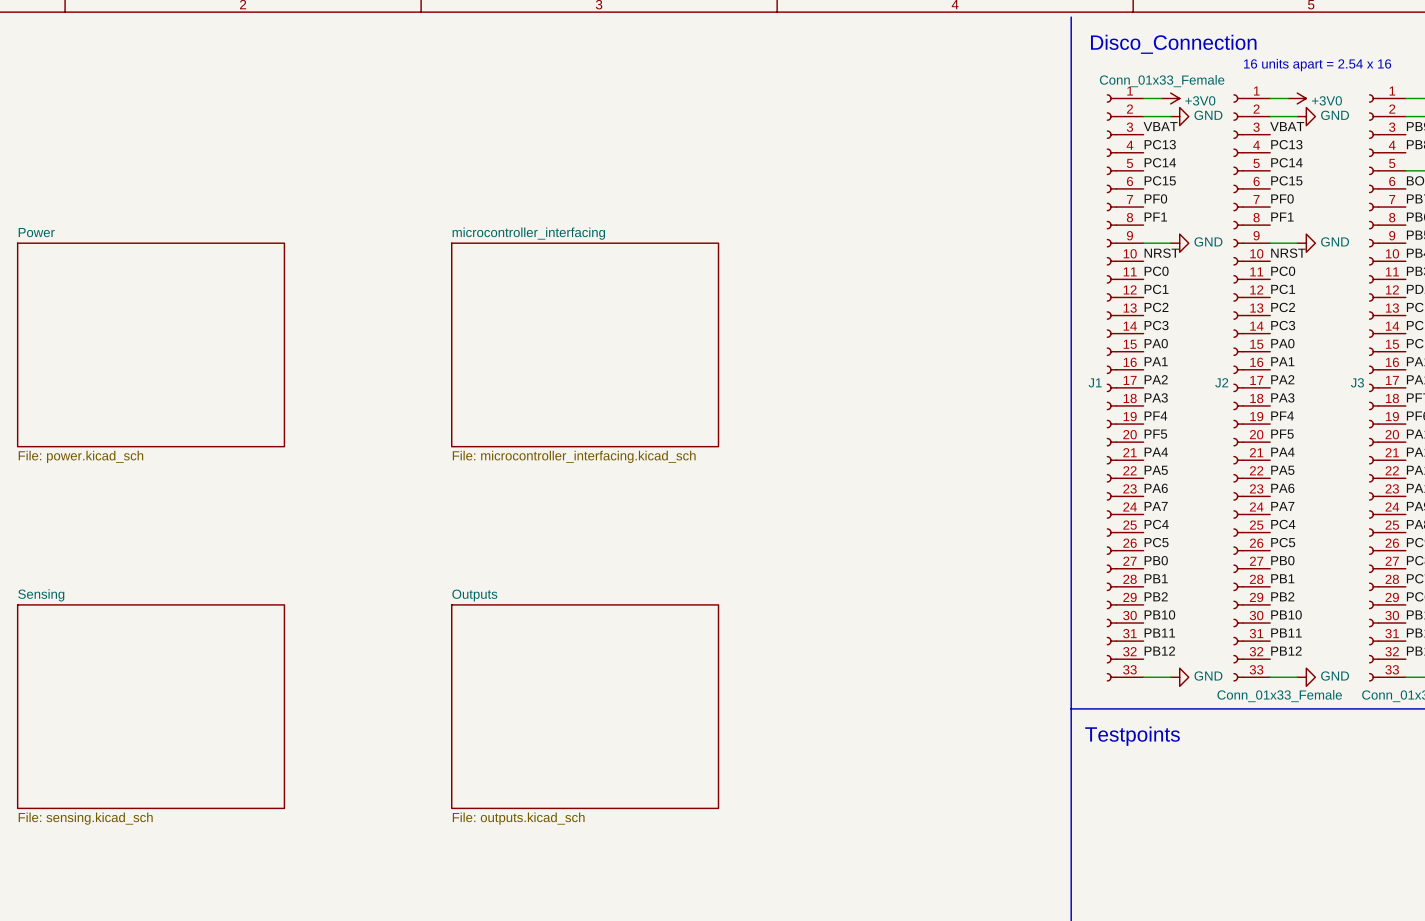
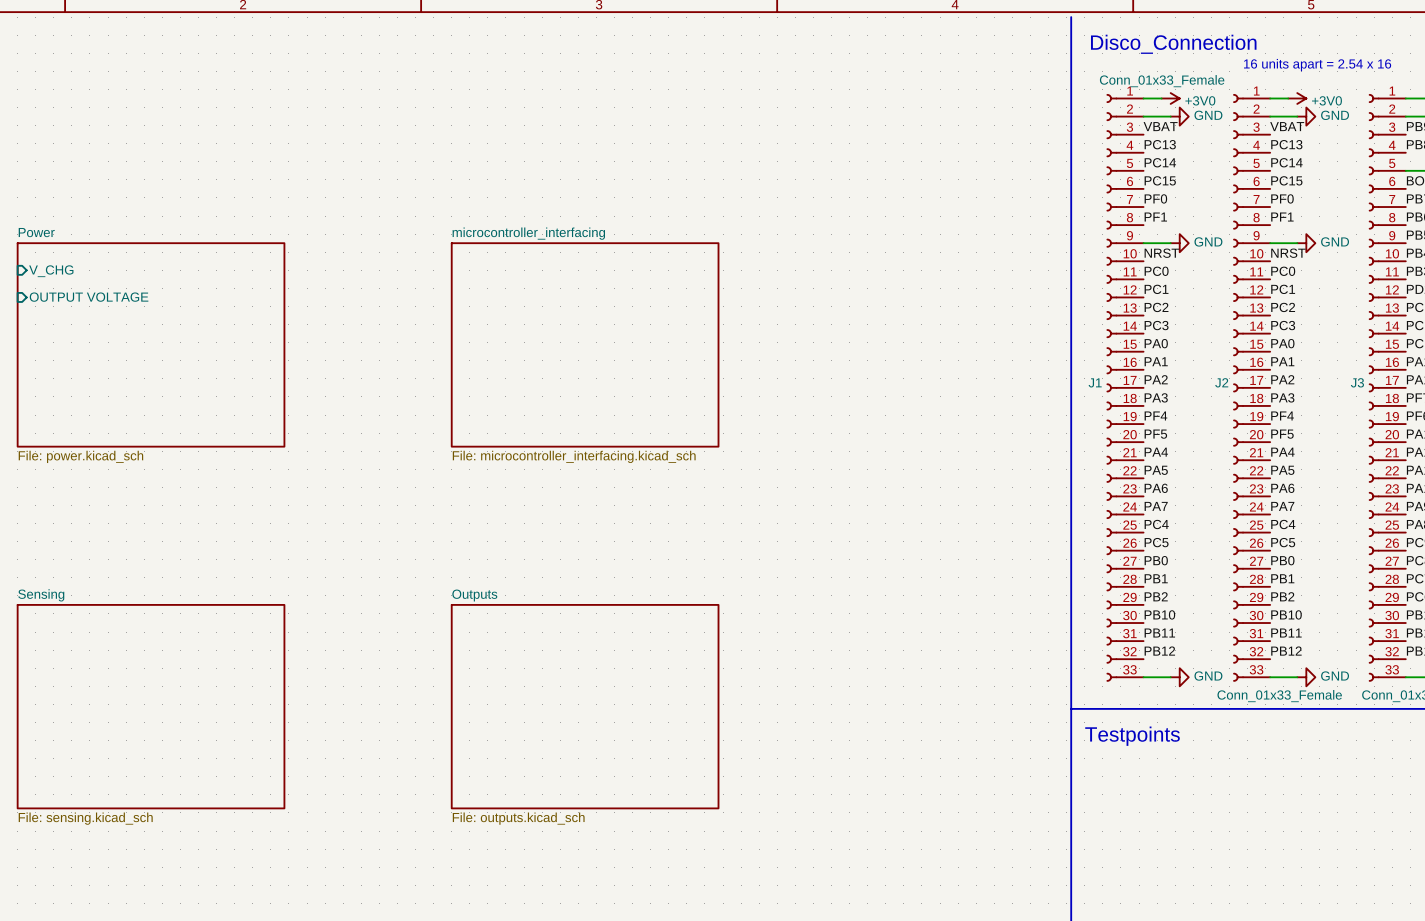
sheet pin: none -> V_CHG (51, 271)
sheet pin: none -> OUTPUT VOLTAGE (89, 297)

